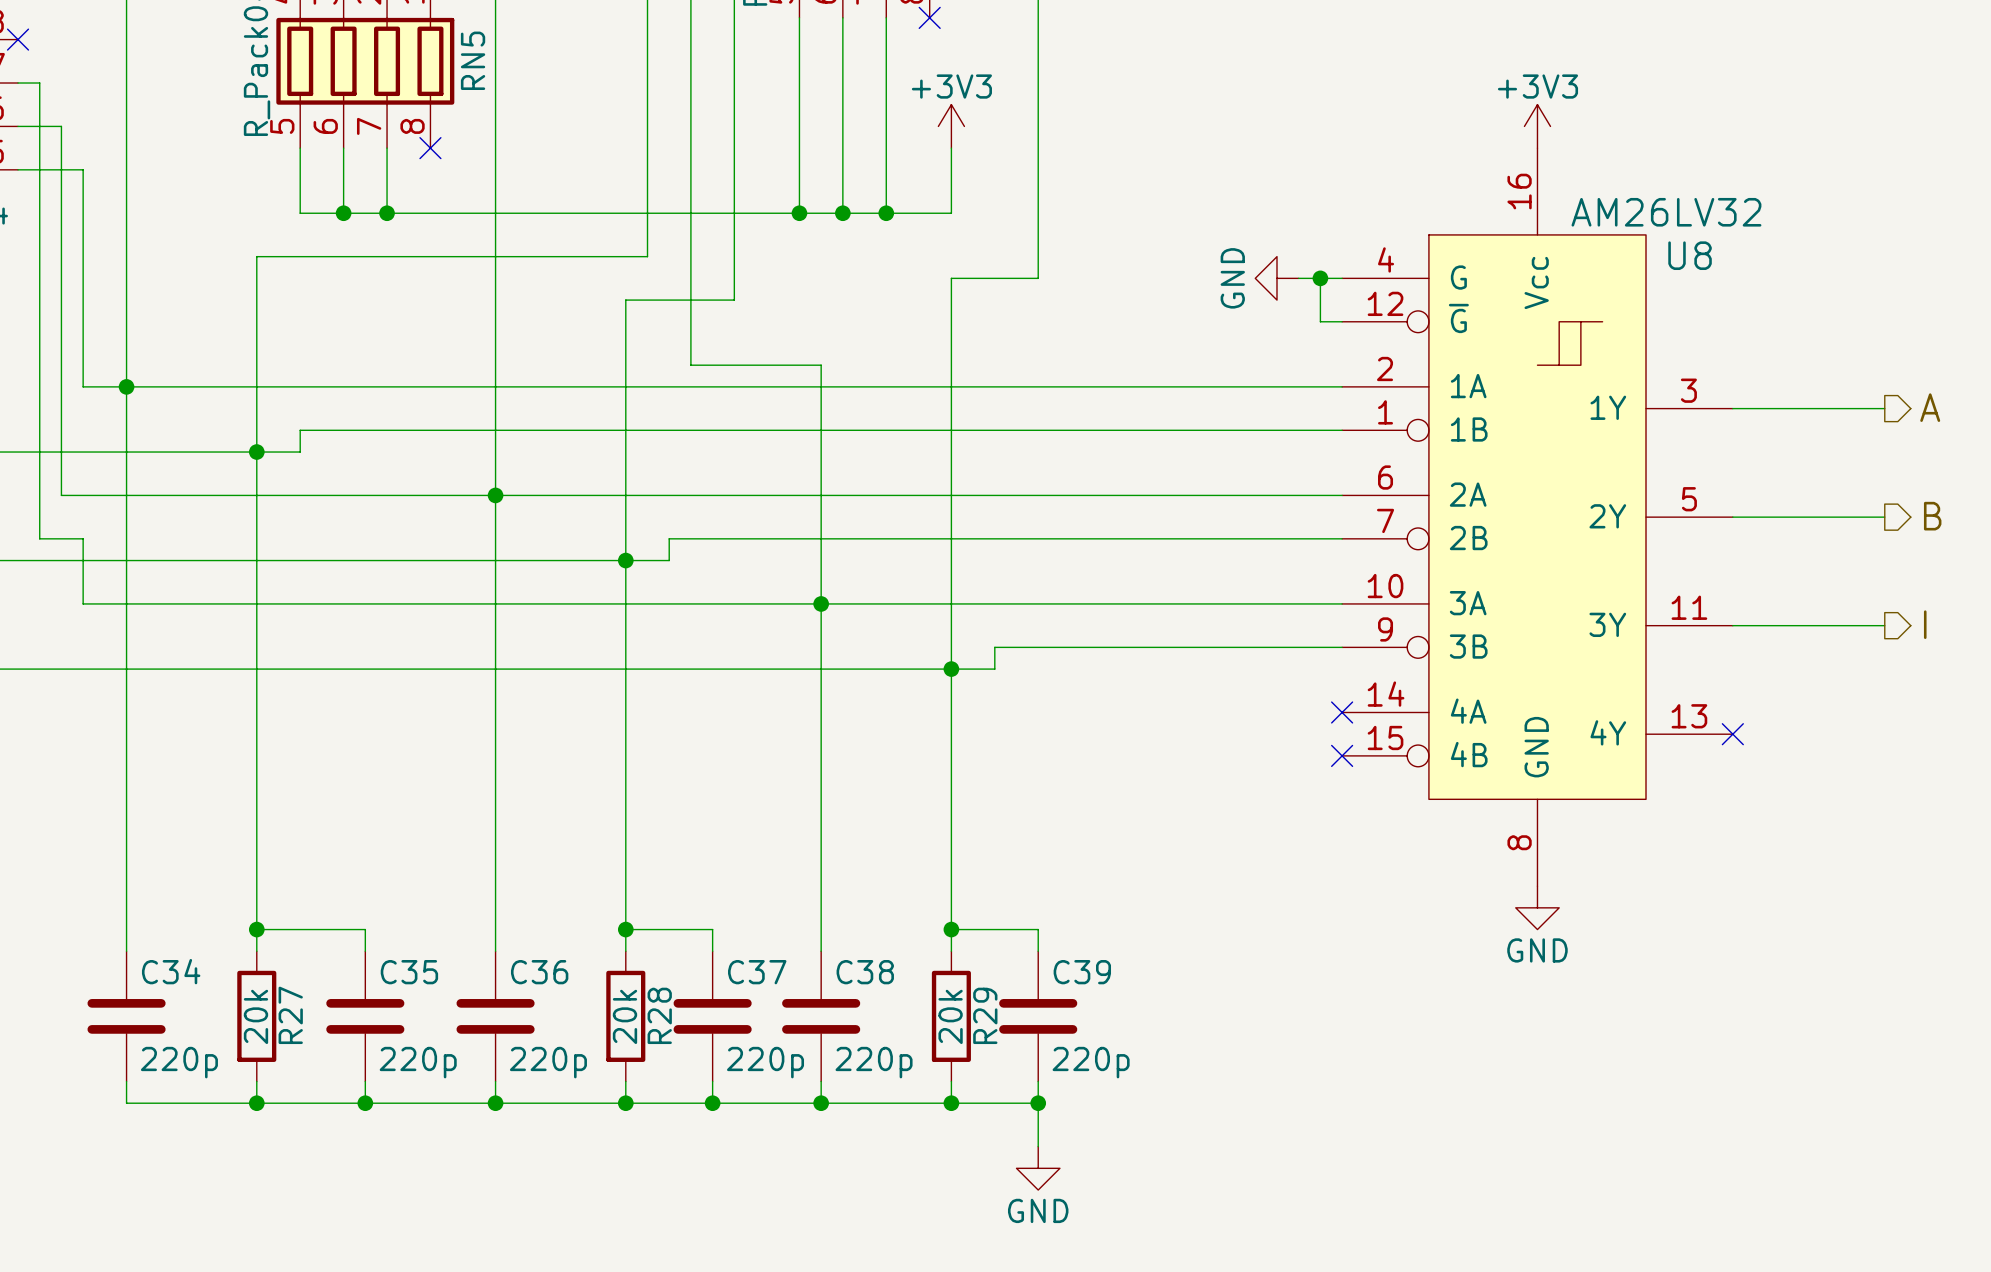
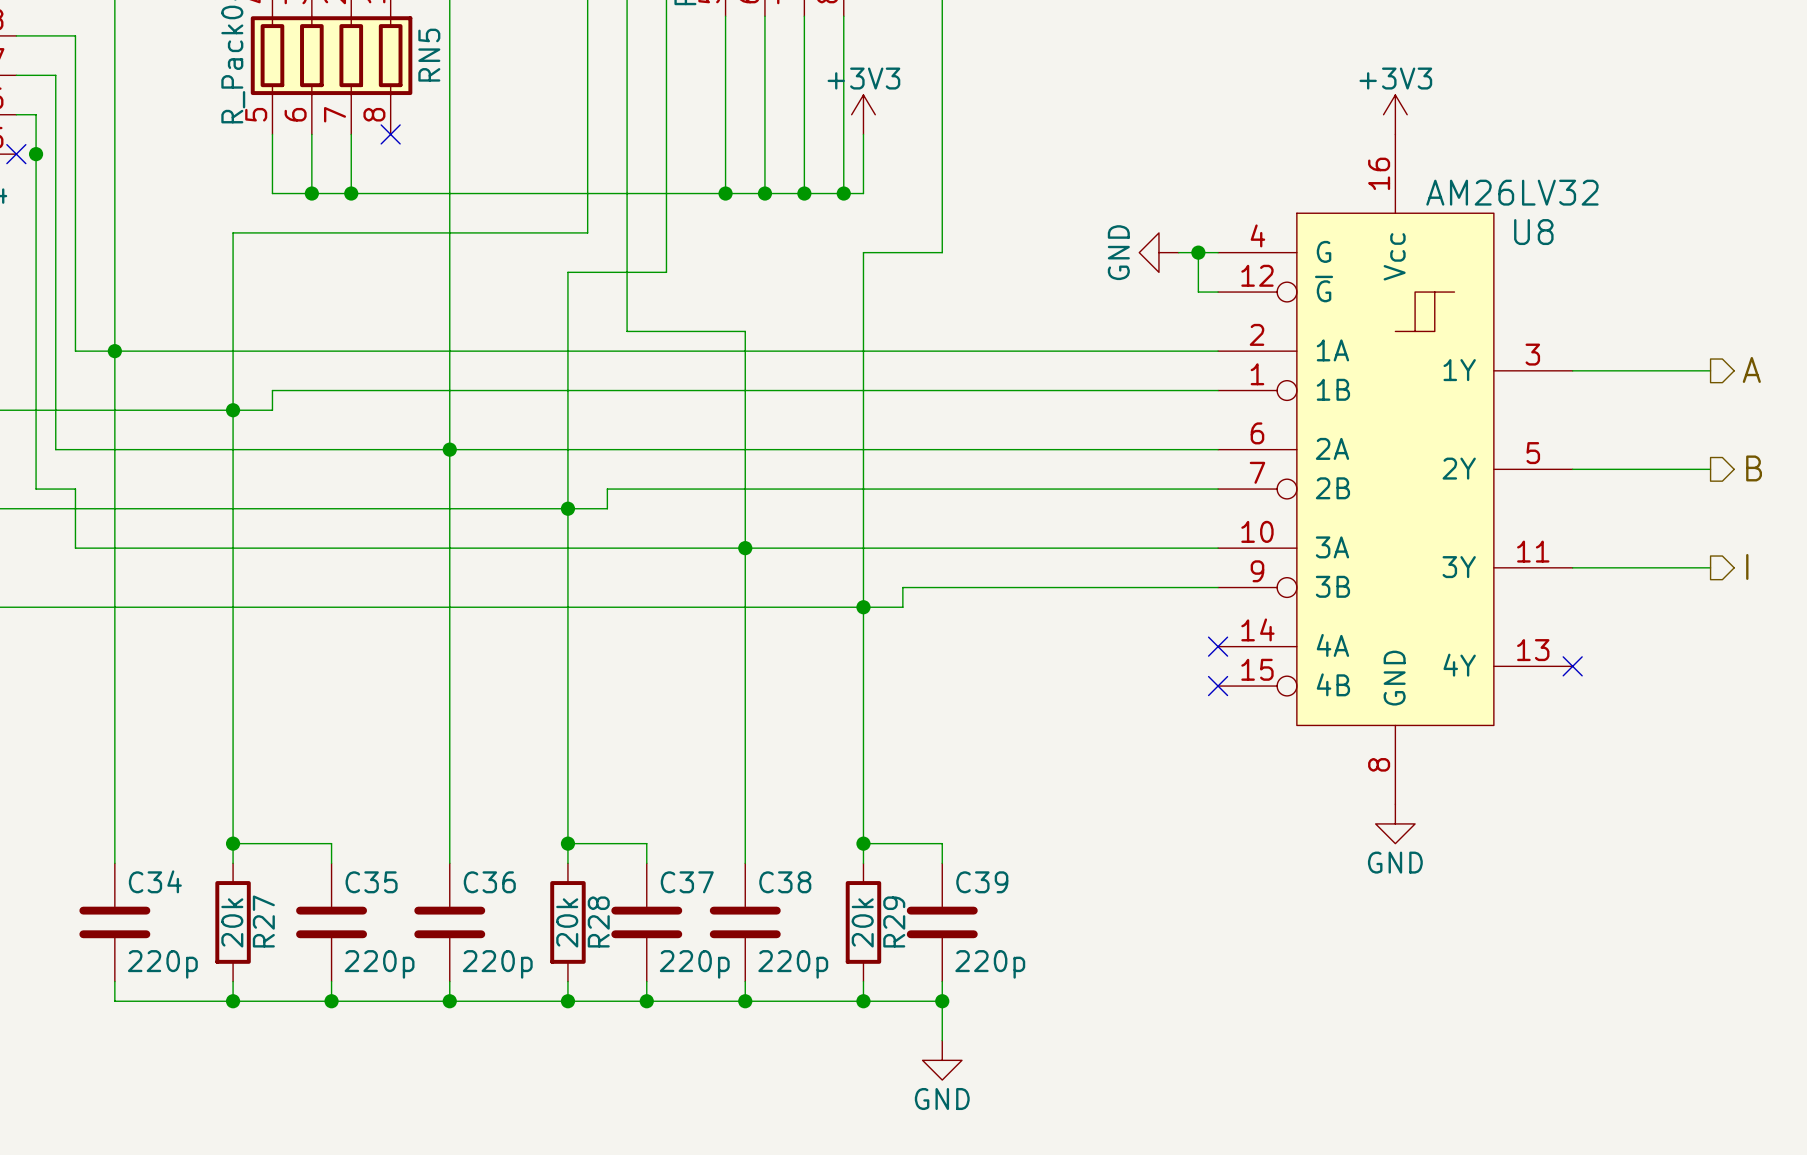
wire: none -> (843, 16) (843, 193)
no-connect mark: (929, 17) -> none
no-connect mark: (18, 39) -> none
wire: (39, 83) (39, 126) (61, 126) -> (36, 75) (55, 75) (55, 114)
wire: (18, 169) (83, 169) -> (16, 35) (75, 35) (75, 154)
no-connect mark: none -> (16, 154)
junction: none -> (36, 154)
junction: none -> (843, 193)

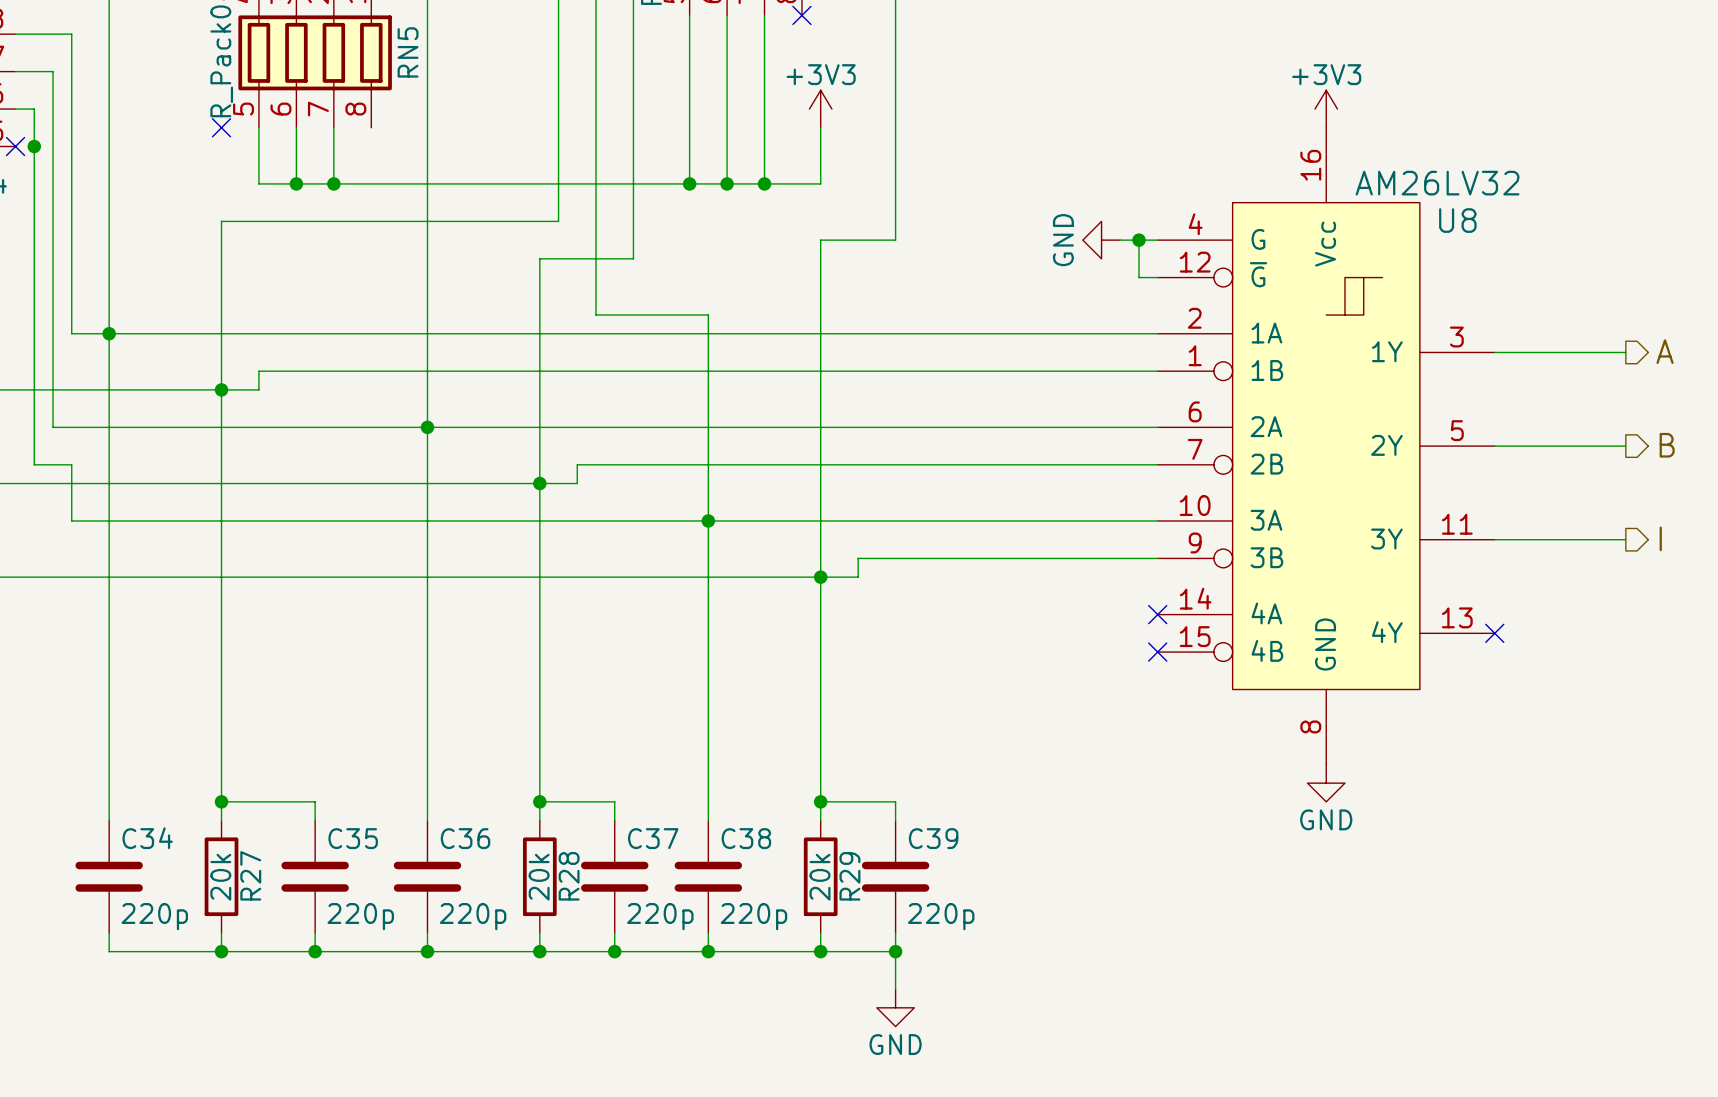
wire: (843, 16) (843, 193) -> none
no-connect mark: none -> (801, 15)
no-connect mark: none -> (221, 127)
no-connect mark: (390, 134) -> none
junction: (843, 193) -> none

